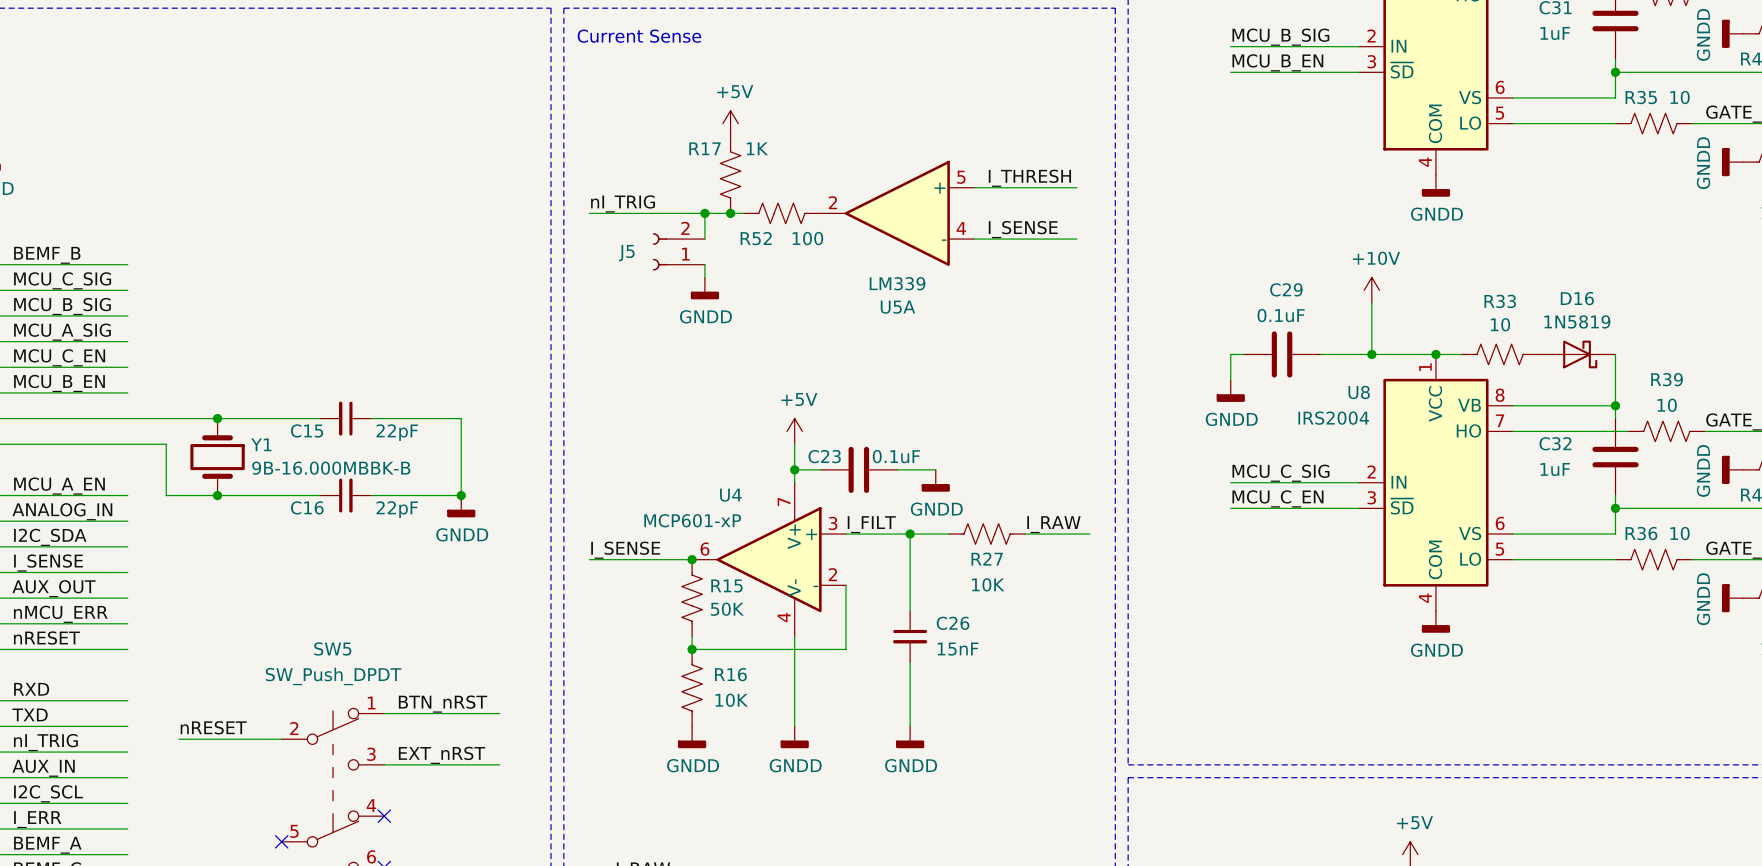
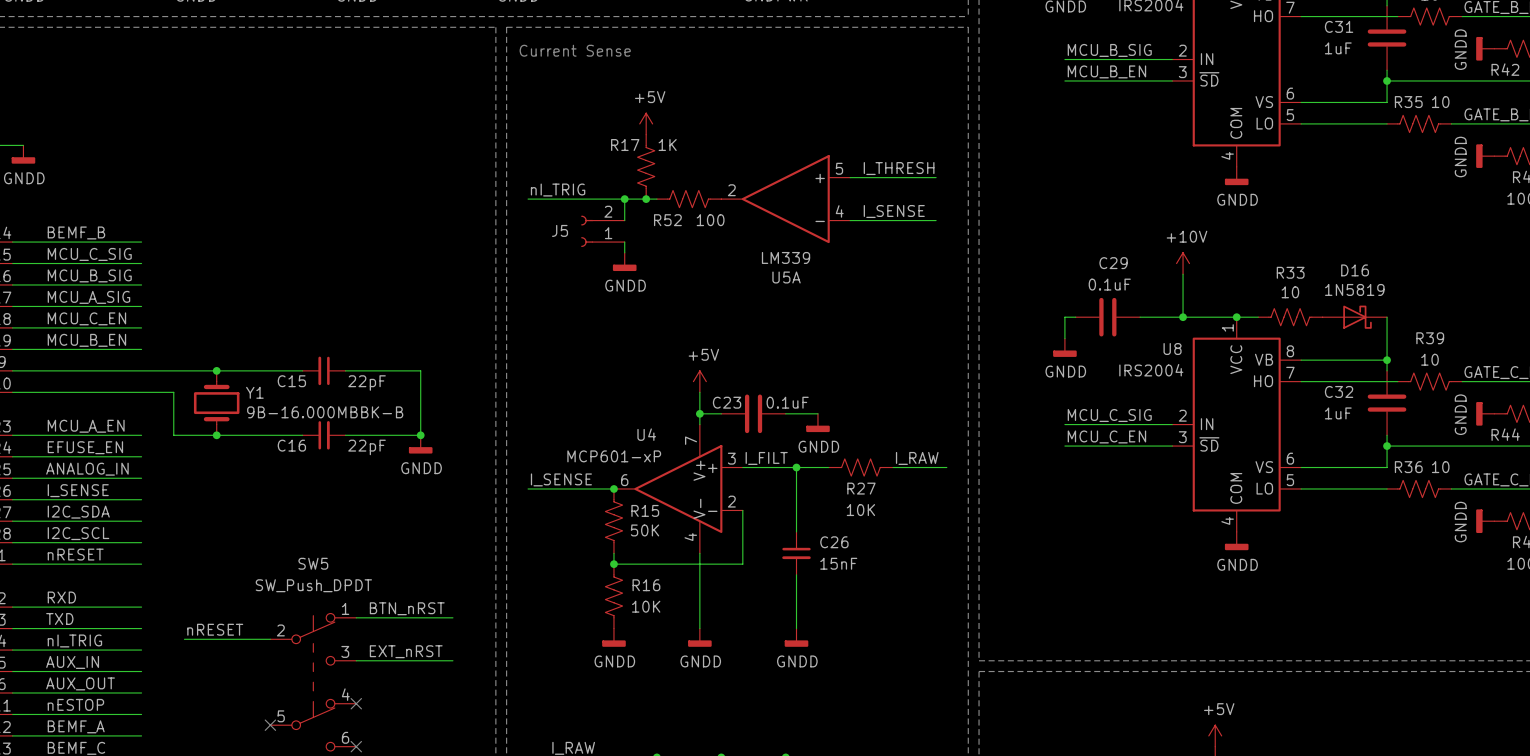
label: ANALOG_IN (62, 511) -> EFUSE_EN (85, 447)
label: I2C_SDA (50, 537) -> ANALOG_IN (87, 469)
label: AUX_OUT (54, 588) -> I2C_SDA (78, 512)
label: nMCU_ERR (60, 614) -> I2C_SCL (78, 533)
label: I2C_SCL (48, 793) -> AUX_OUT (80, 683)
label: I_ERR (37, 819) -> nESTOP (75, 704)

